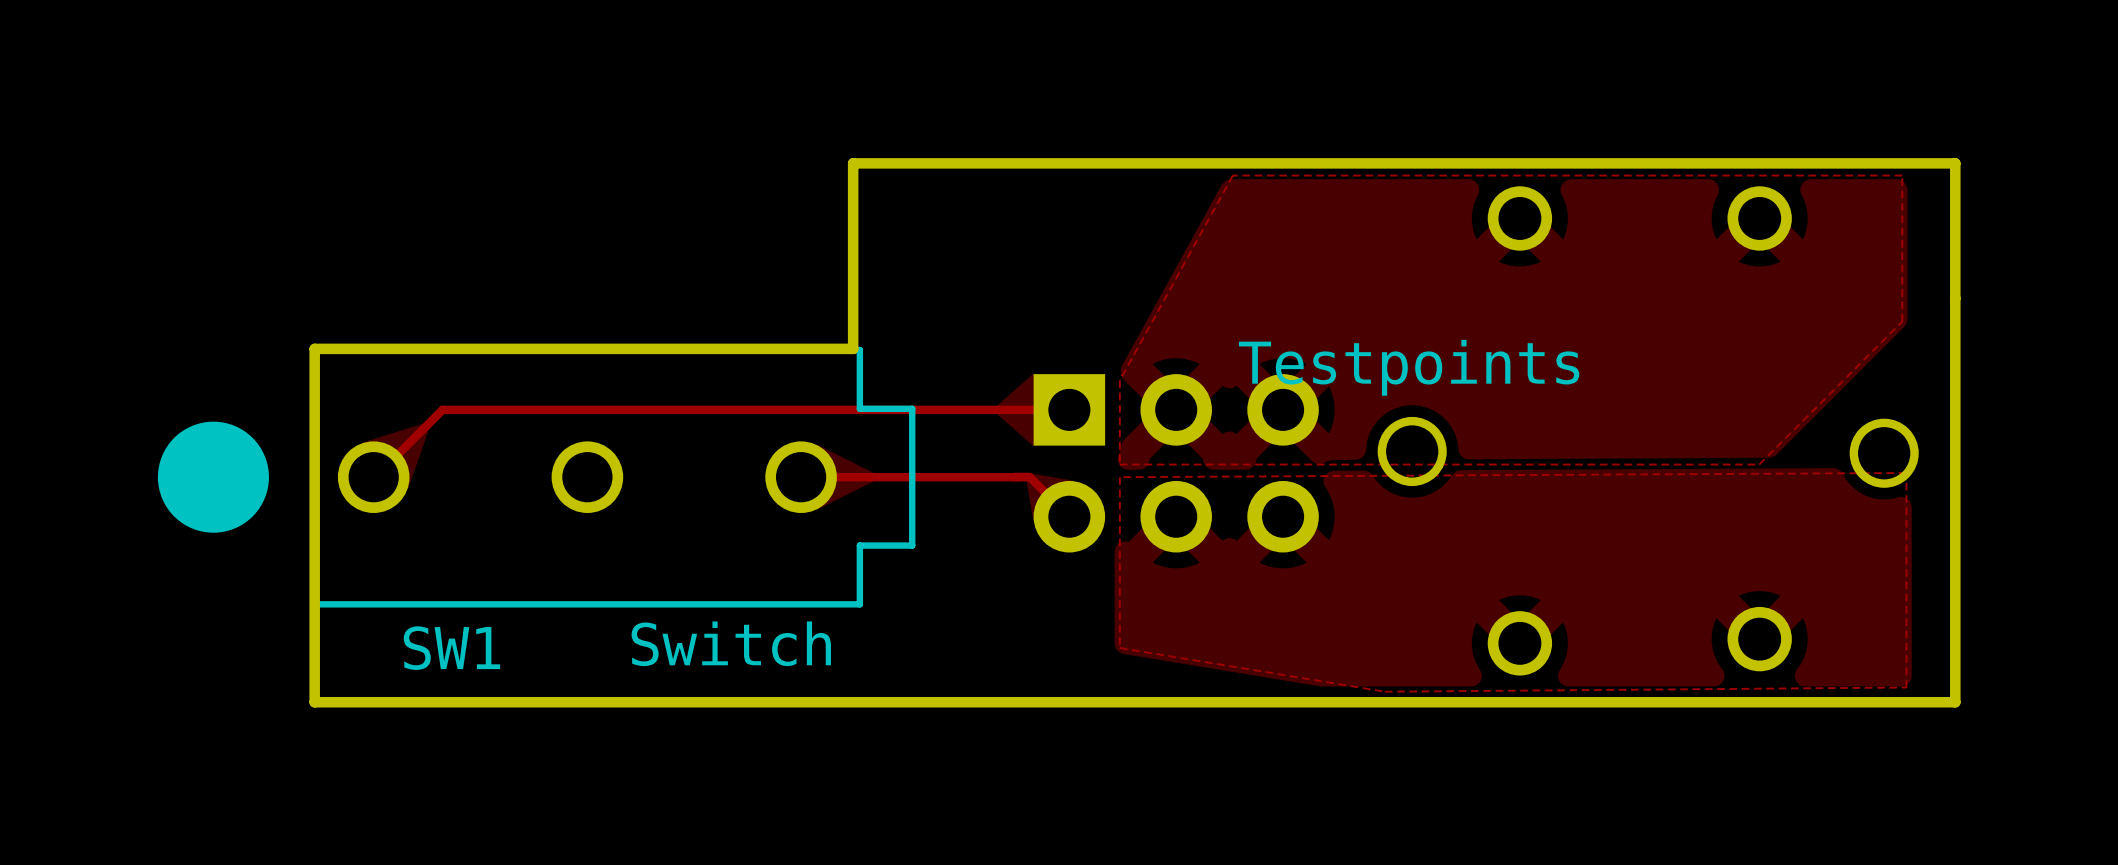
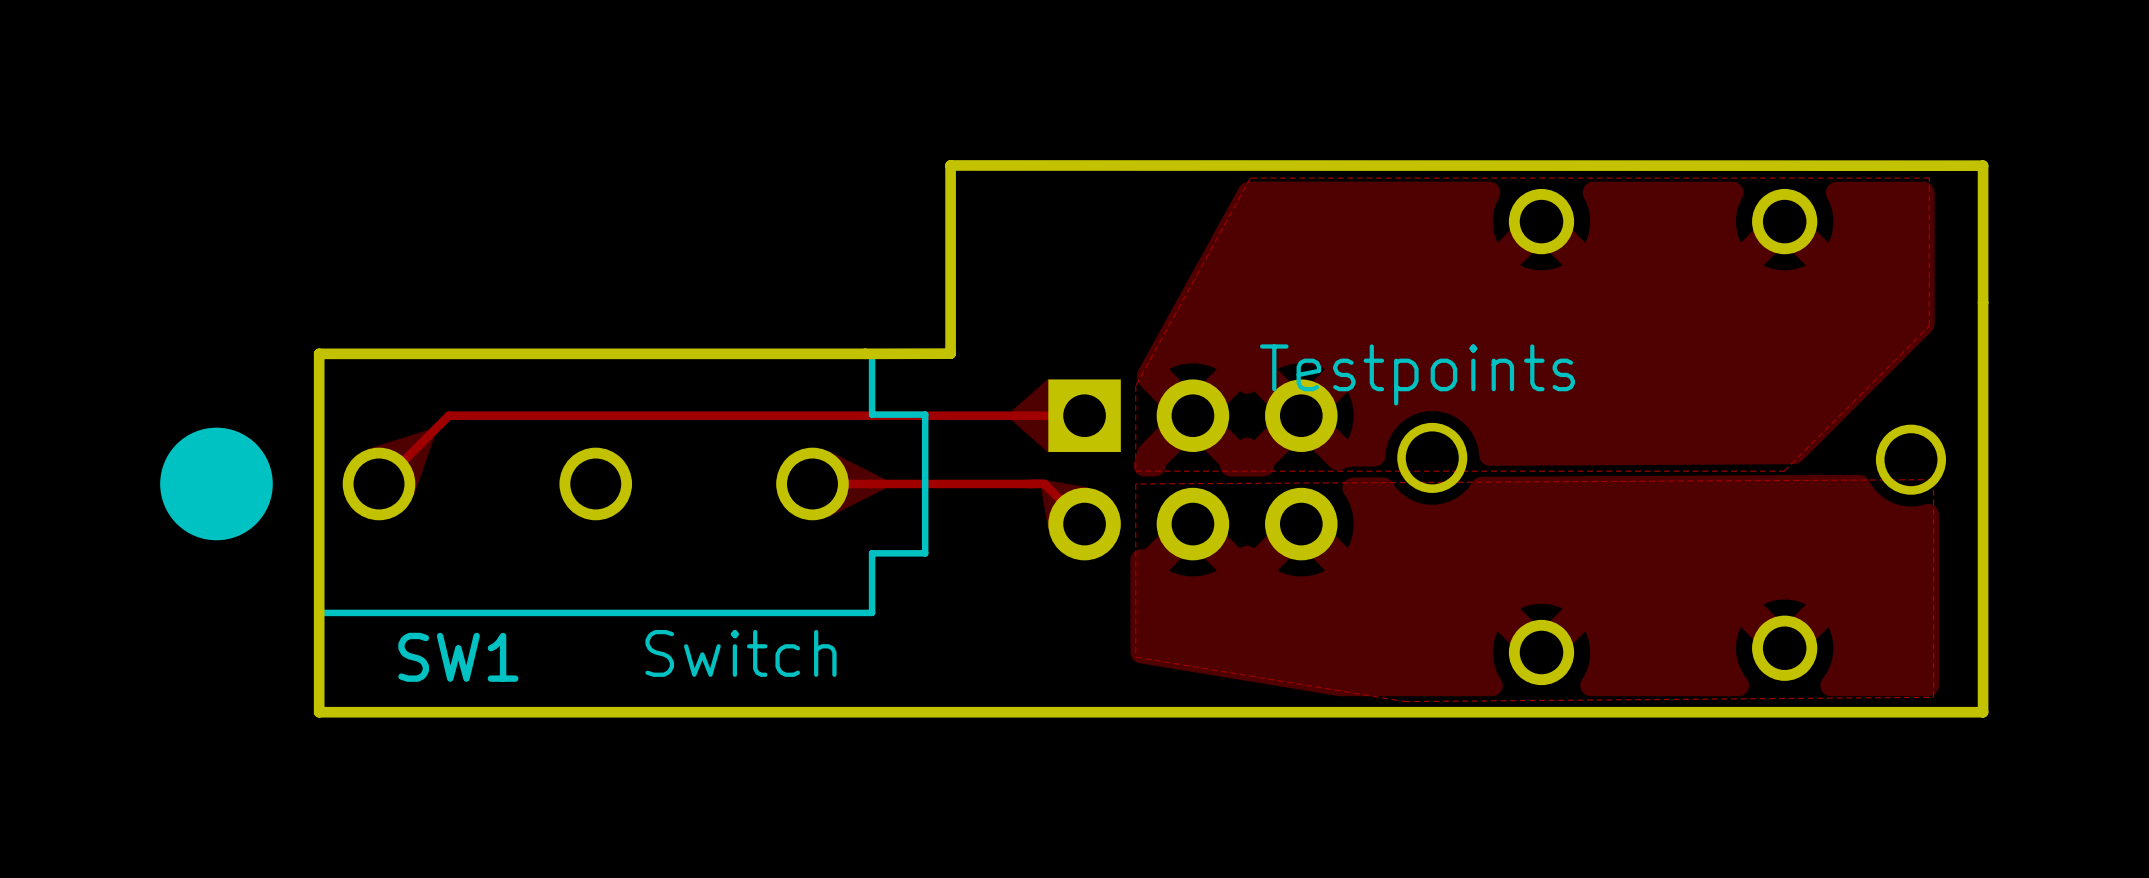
board edge: (1955, 163) (853, 163) (853, 348) -> (1983, 165) (950, 165) (950, 353) (865, 353)

